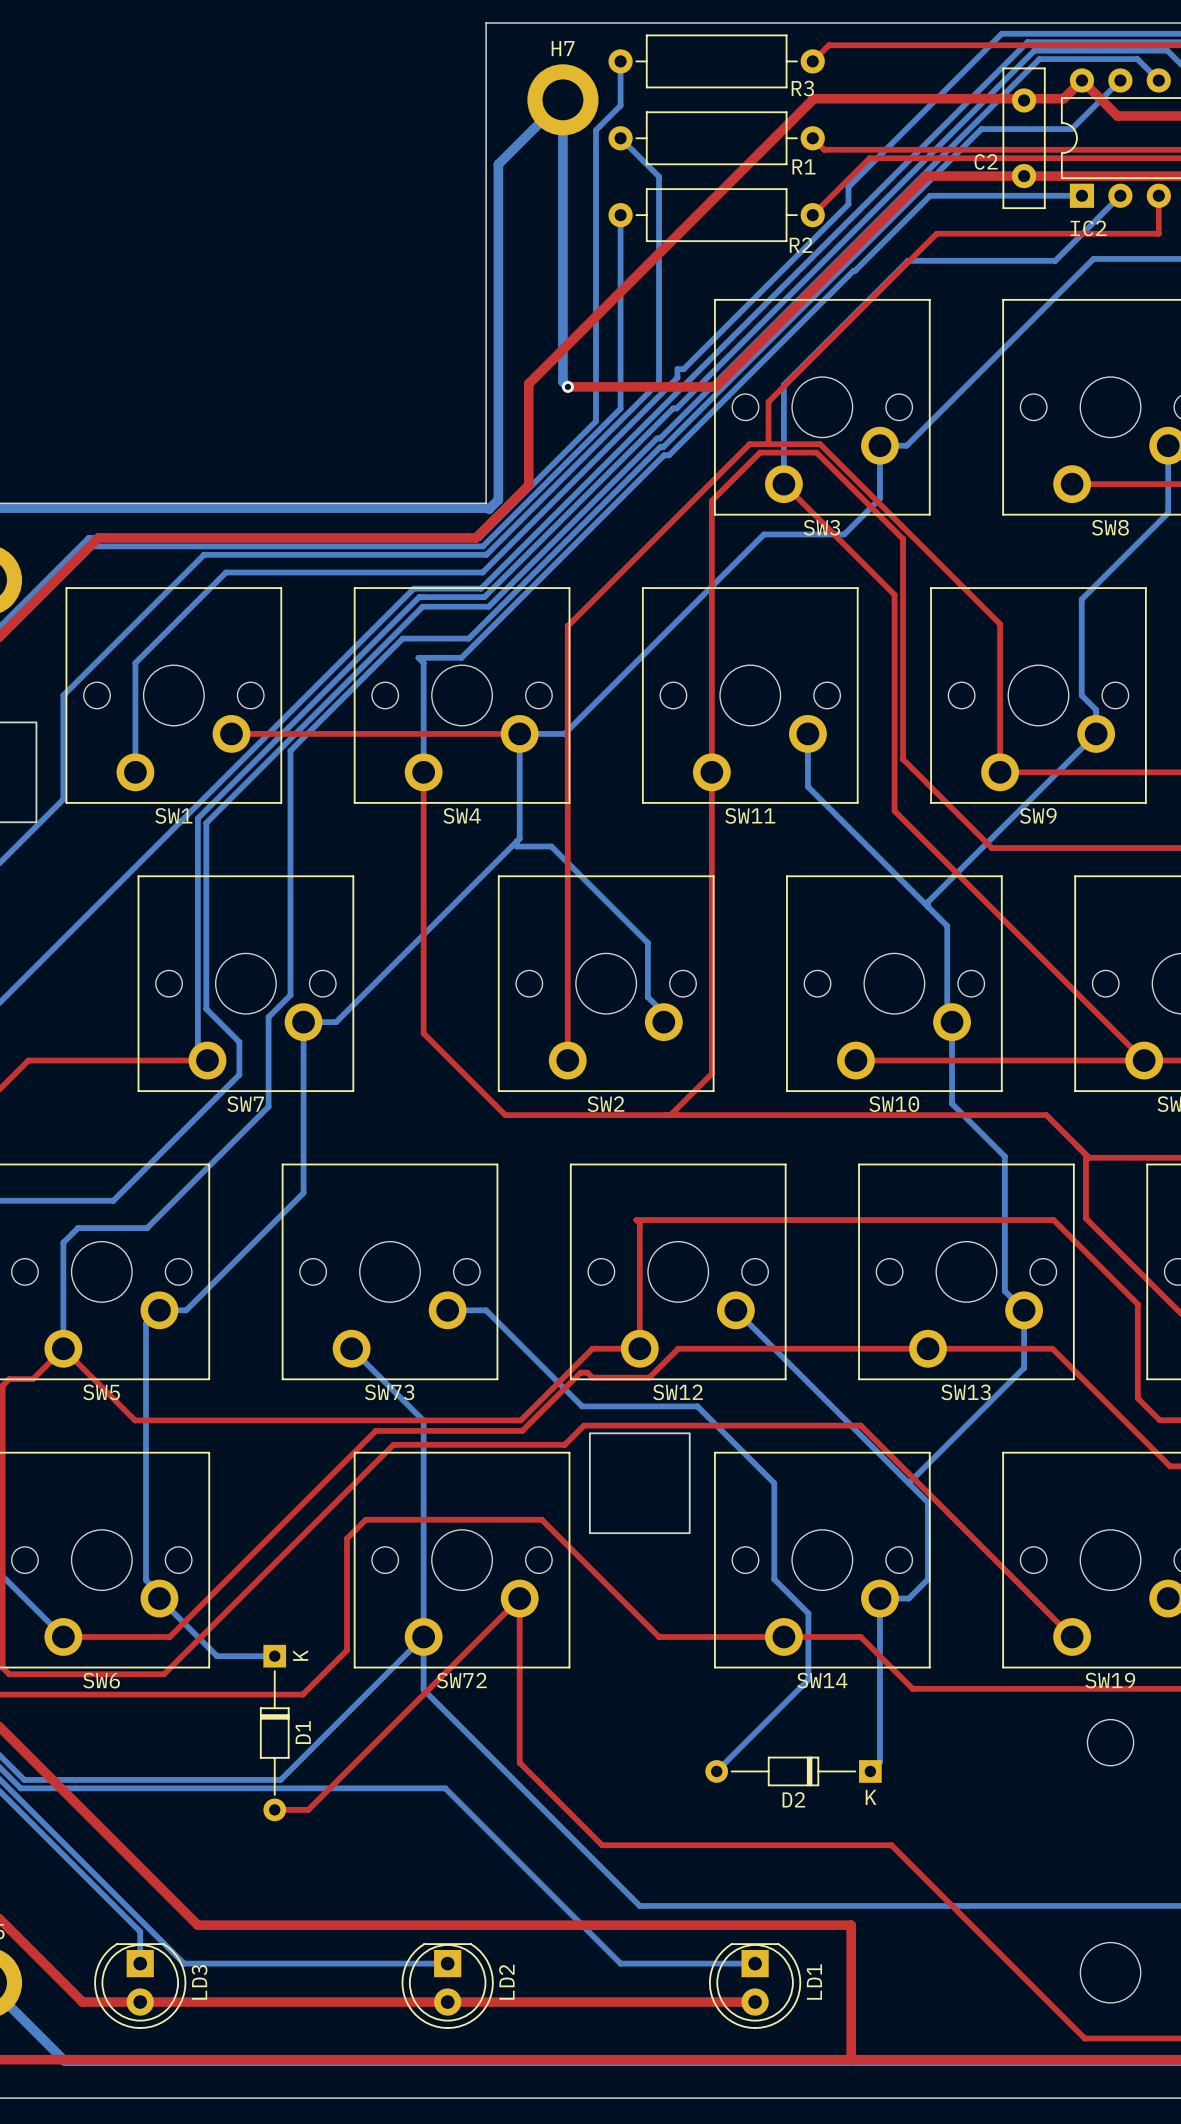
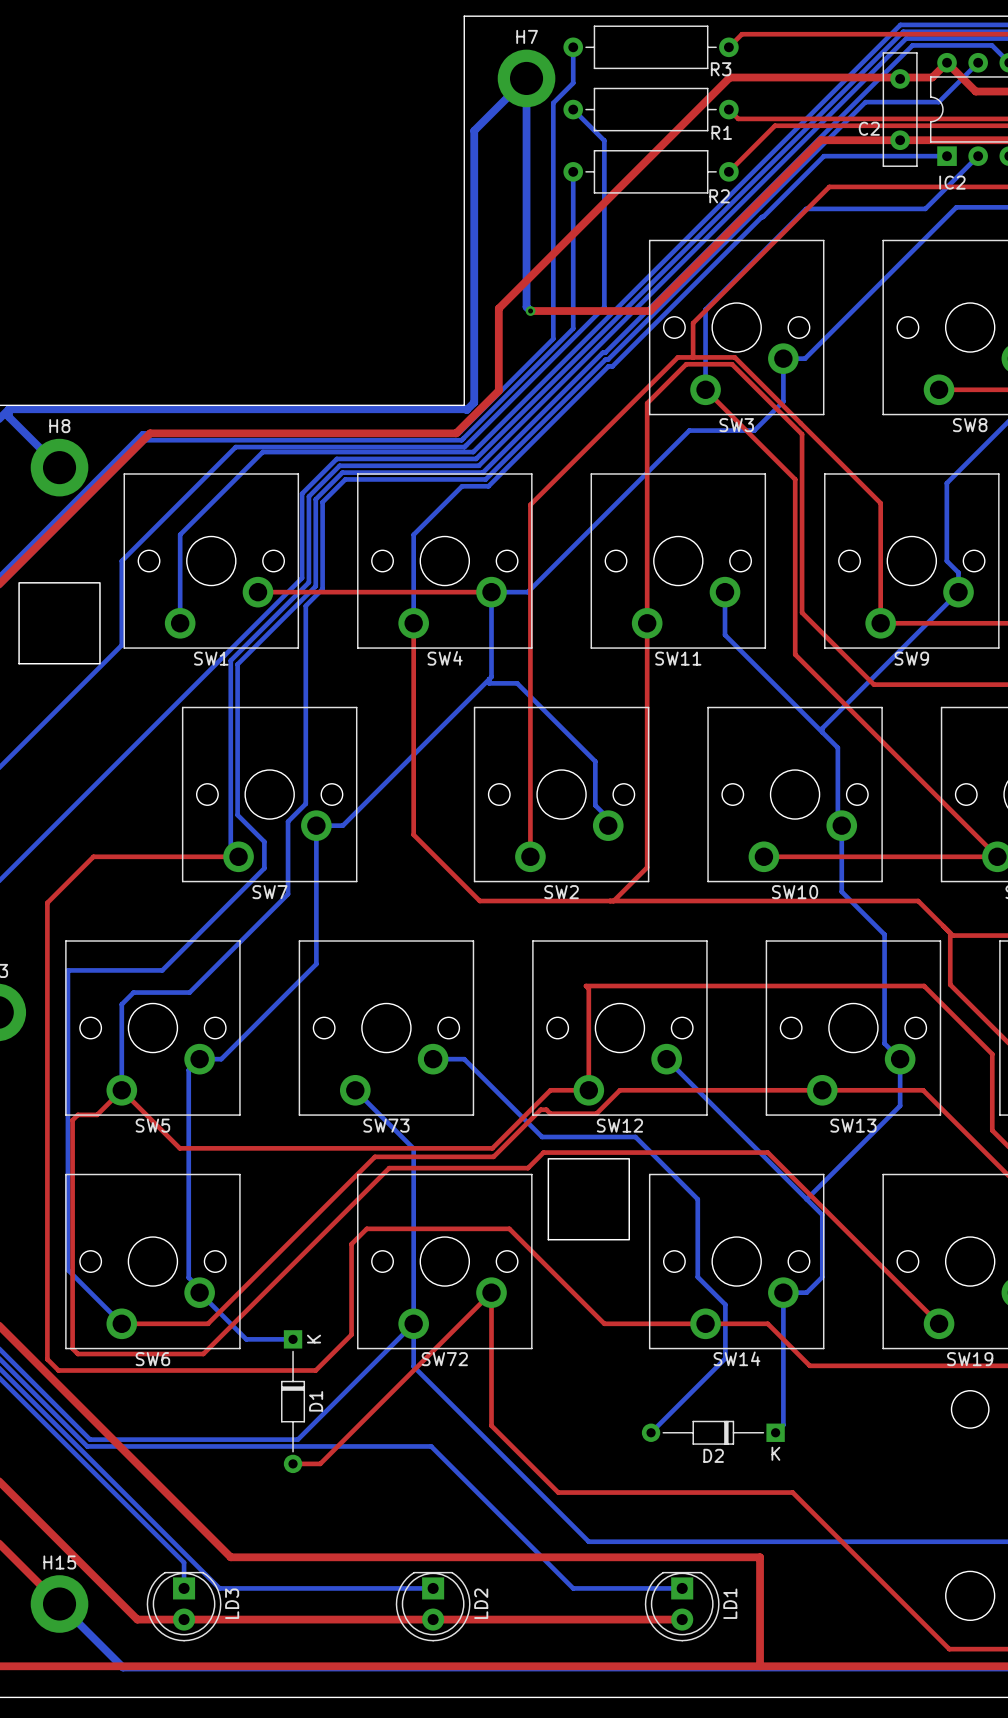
bottom track: (1024, 33) (1001, 33) (848, 187) (848, 204) (683, 369) (677, 369) (677, 377) (482, 572) (225, 572) -> (900, 24) (473, 452) (262, 452) (253, 461)
bottom track: (1027, 42) (480, 588) (413, 588) (285, 716) -> (903, 31) (476, 458) (336, 458) (302, 493) (302, 578)
bottom track: (1034, 50) (676, 408) (673, 408) (484, 597) (419, 597) (294, 721) -> (908, 38) (906, 38) (478, 465) (339, 465) (308, 496) (308, 582)
bottom track: (509, 586) (488, 606) (422, 606) (302, 726) -> (482, 472) (342, 472) (315, 499) (315, 586)
bottom track: (512, 594) (468, 638) (402, 638) (311, 730) -> (485, 479) (345, 479) (322, 502) (322, 589)
bottom track: (516, 603) (461, 657) (418, 657) (423, 663) -> (488, 486) (462, 486) (413, 534)

